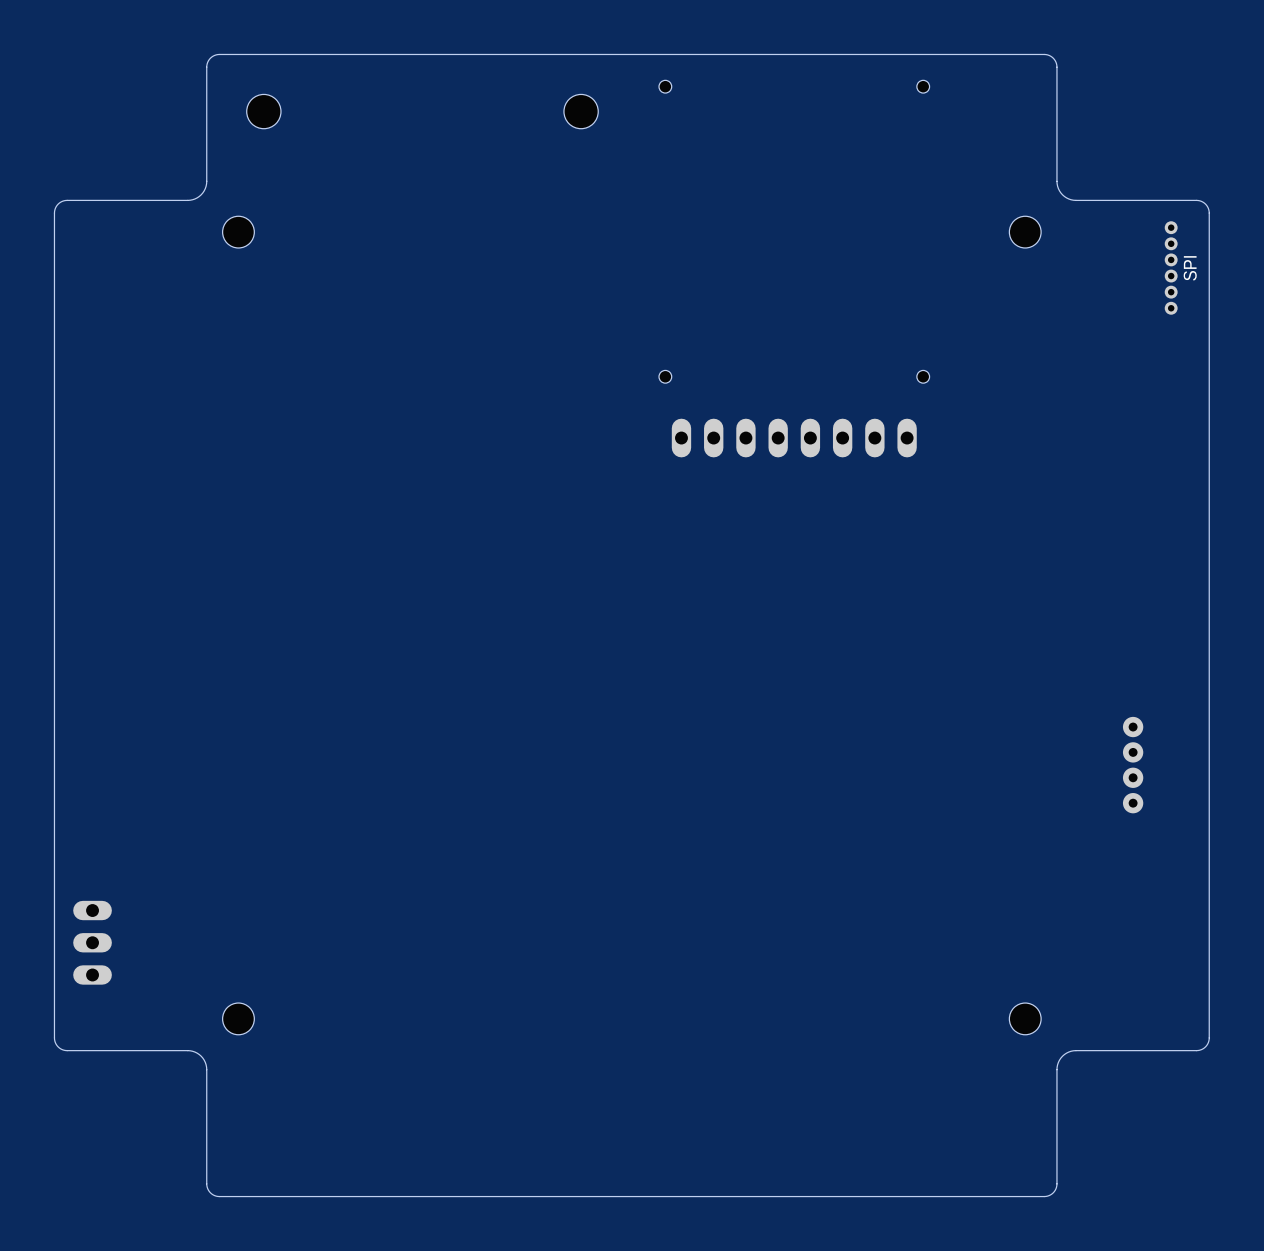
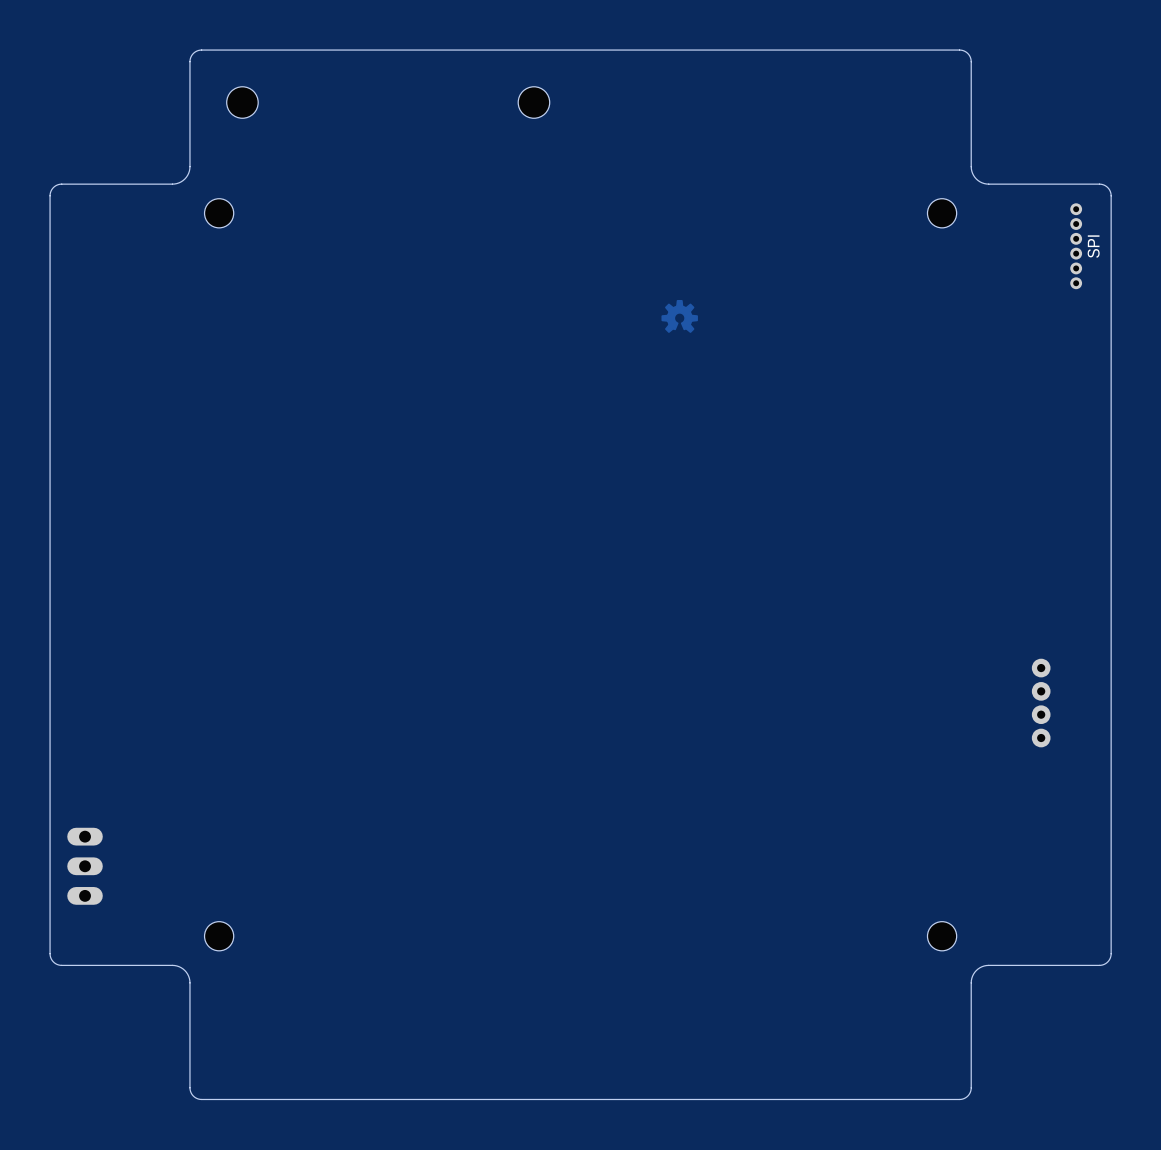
hole: (665, 86) -> none
hole: (923, 86) -> none
drawing: none -> [661, 300, 698, 333]
hole: (665, 376) -> none
hole: (923, 376) -> none
part: (794, 438) -> none

